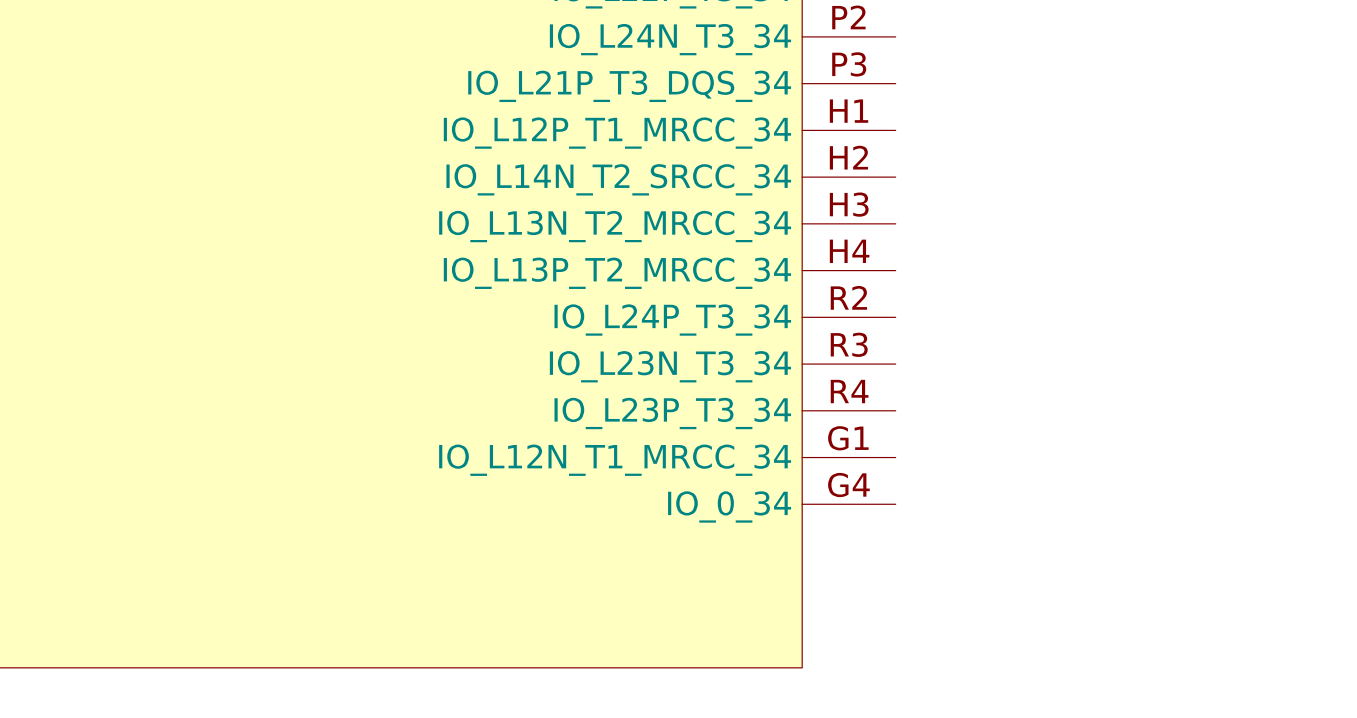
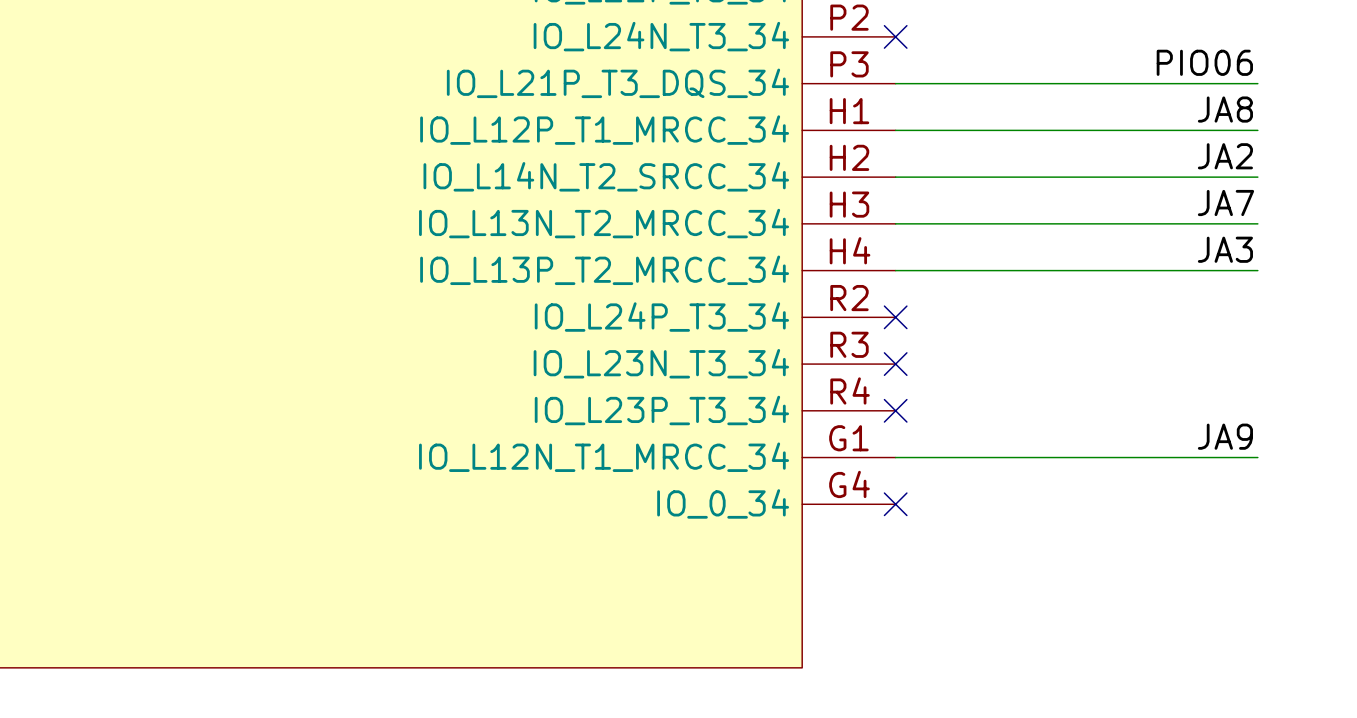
no-connect mark: none -> (895, 36)
label: none -> PIO06 (1204, 62)
wire: none -> (895, 83) (1257, 83)
label: none -> JA8 (1225, 109)
wire: none -> (895, 130) (1257, 130)
label: none -> JA2 (1225, 156)
wire: none -> (895, 177) (1257, 177)
label: none -> JA7 (1225, 203)
wire: none -> (895, 223) (1257, 223)
label: none -> JA3 (1225, 249)
wire: none -> (895, 270) (1257, 270)
no-connect mark: none -> (895, 317)
no-connect mark: none -> (895, 364)
no-connect mark: none -> (895, 410)
label: none -> JA9 (1225, 436)
wire: none -> (895, 457) (1257, 457)
no-connect mark: none -> (895, 504)

